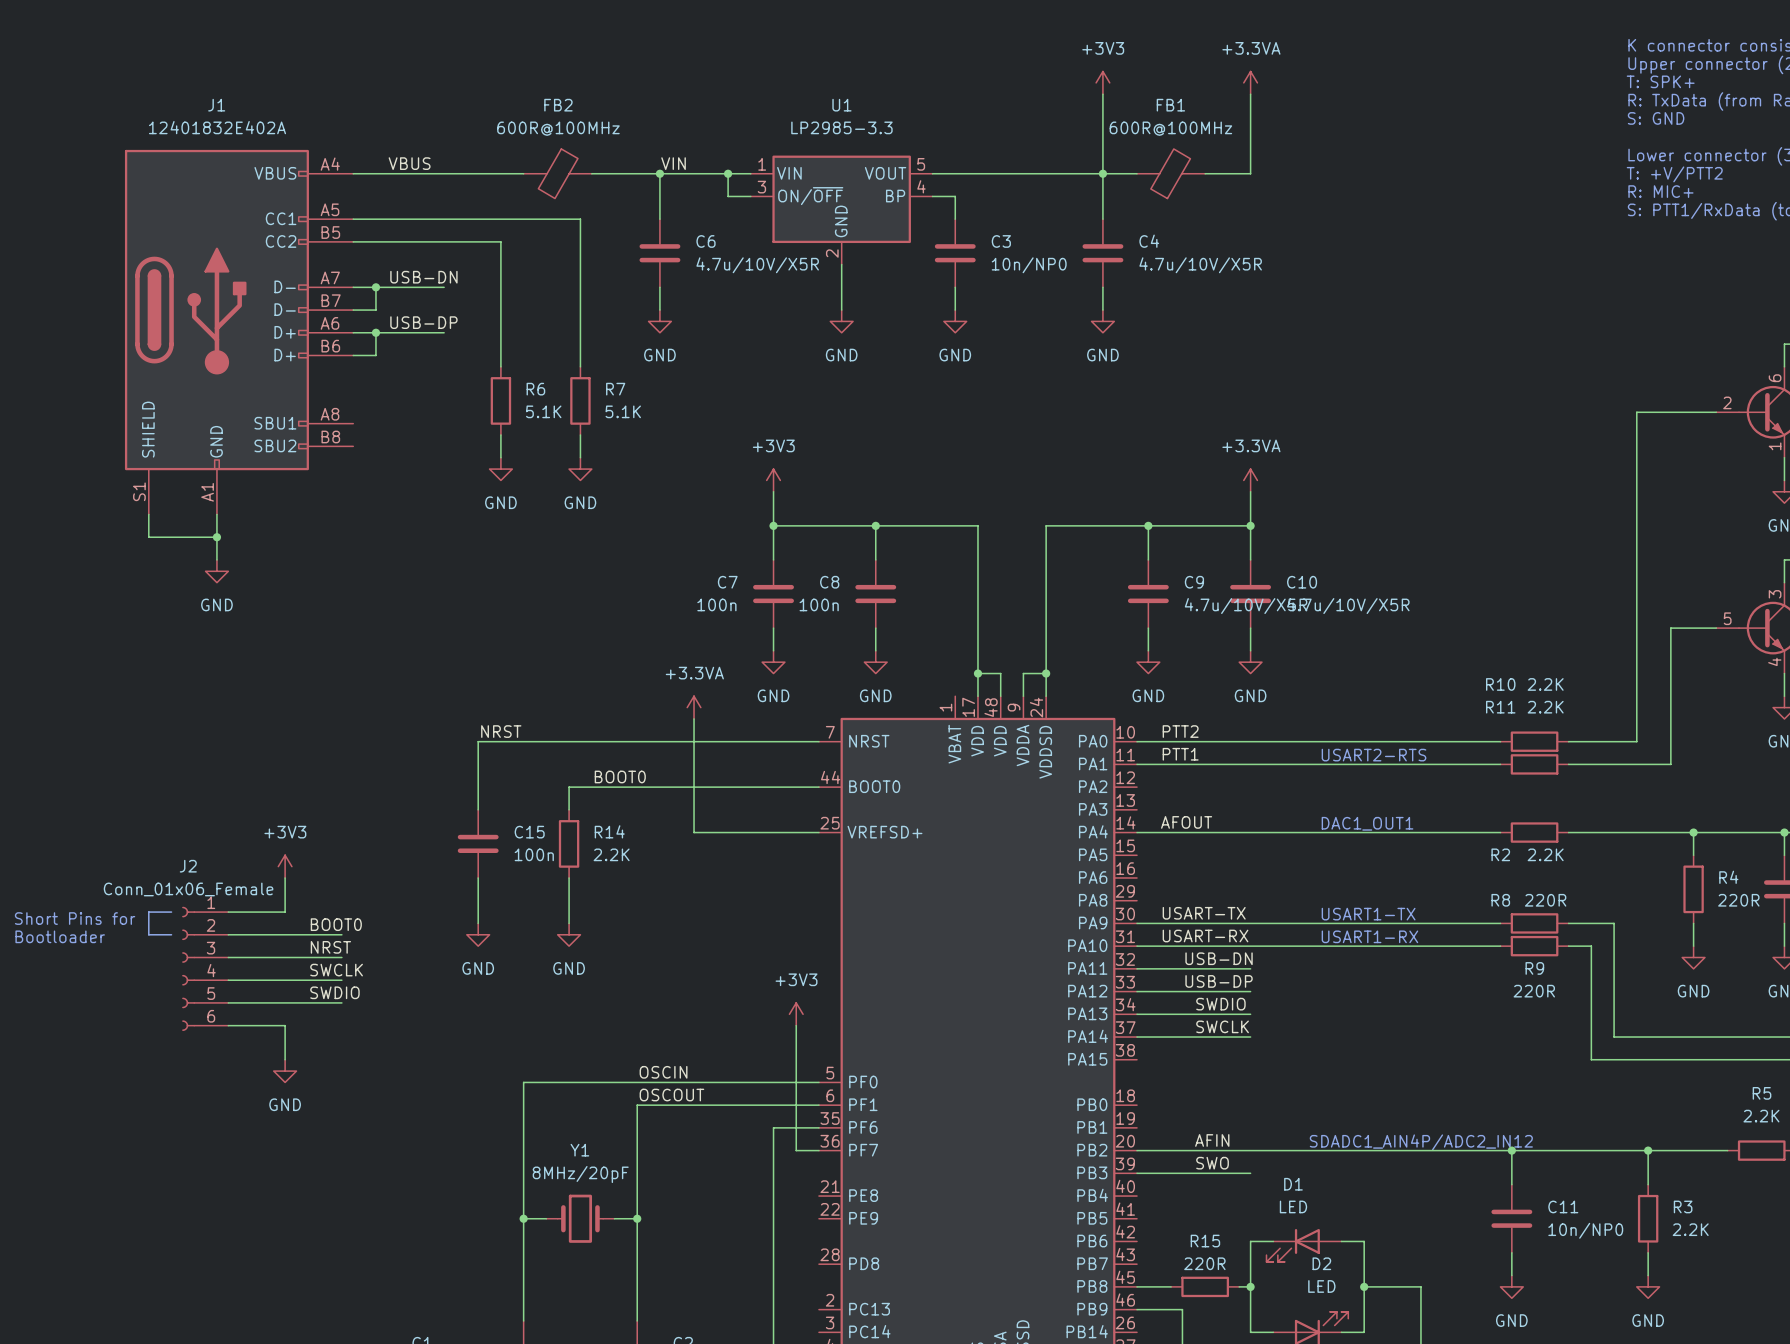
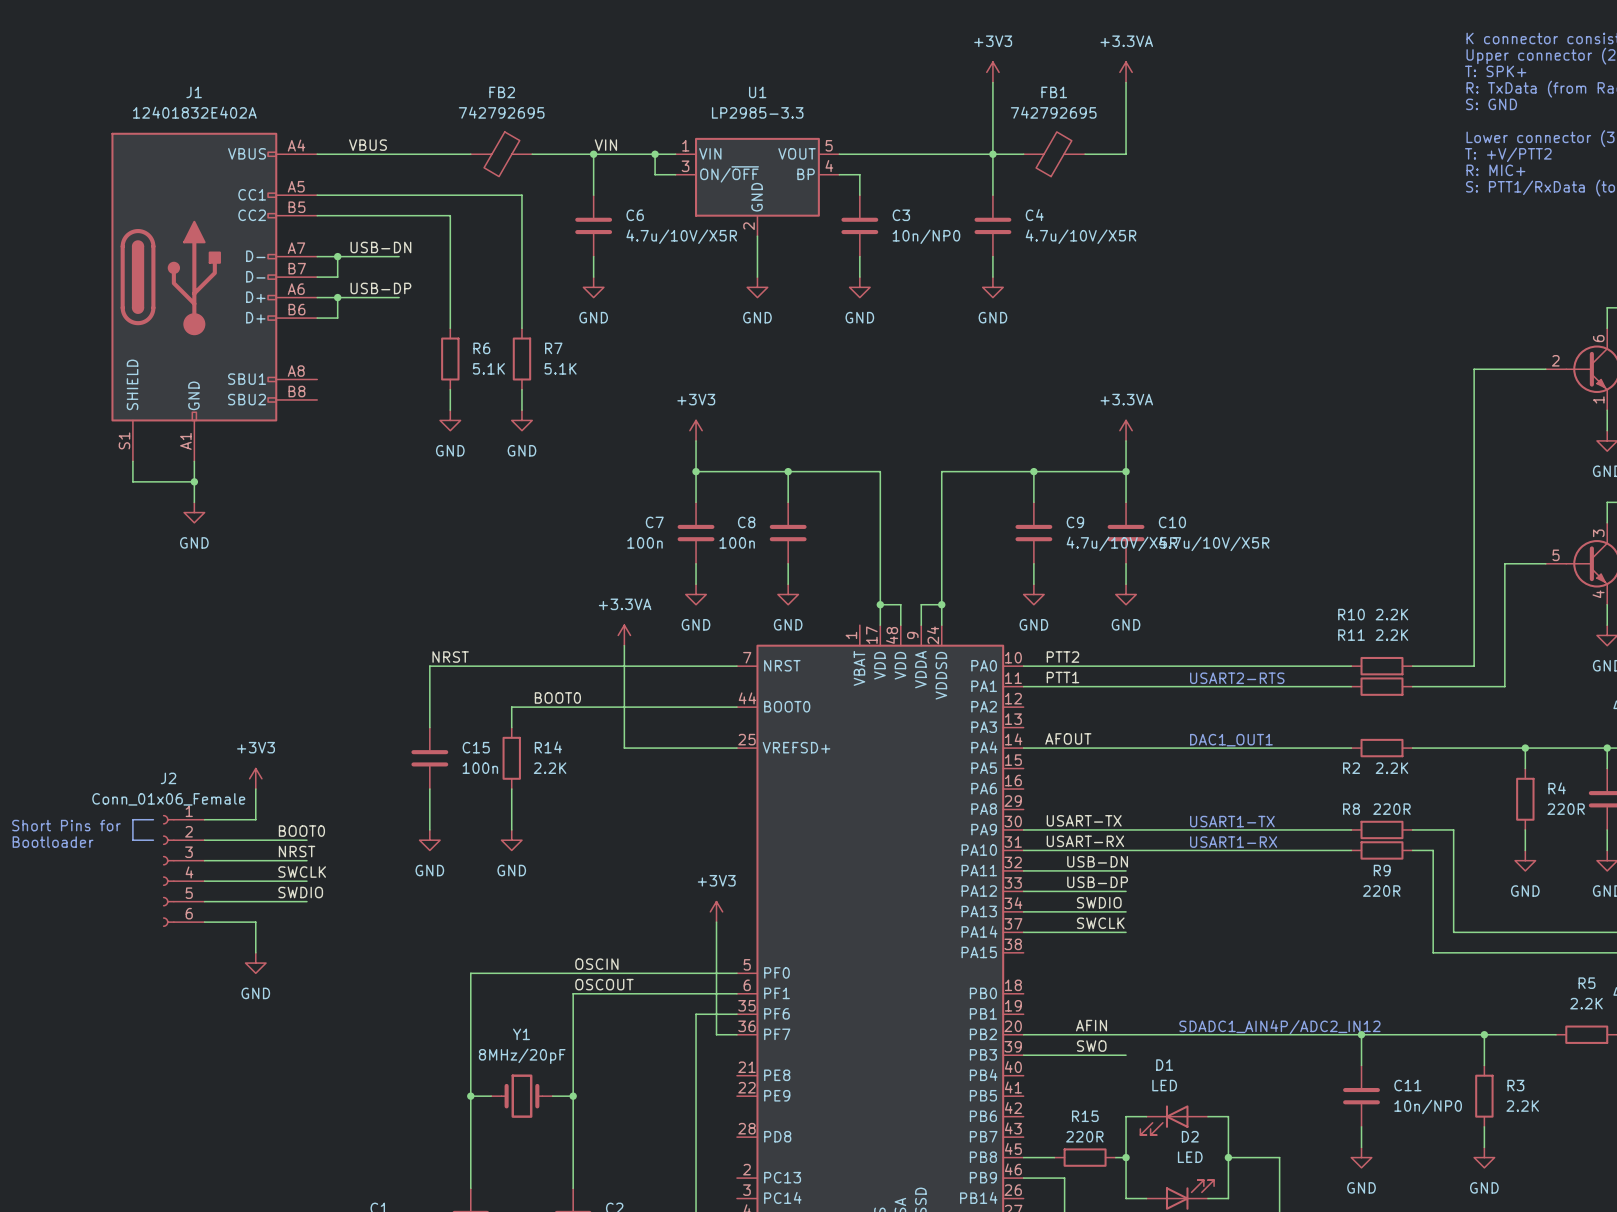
FB2 value: 600R@100MHz (558, 128) -> 742792695 (501, 112)
FB1 value: 600R@100MHz (1170, 128) -> 742792695 (1053, 112)

